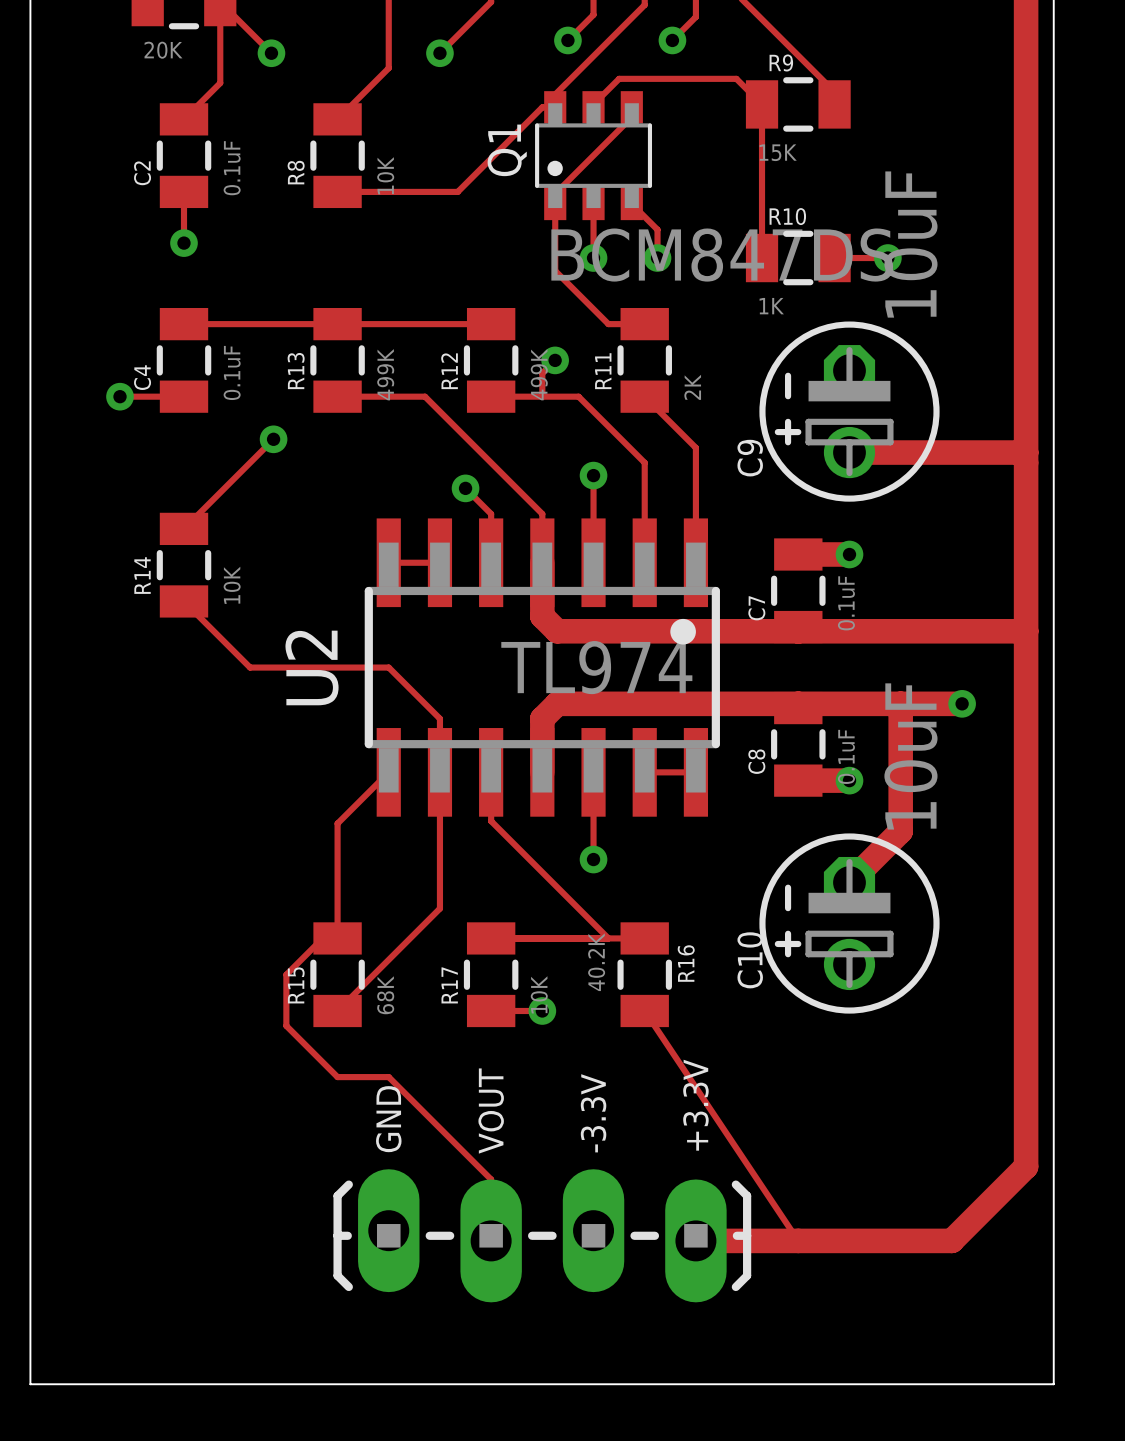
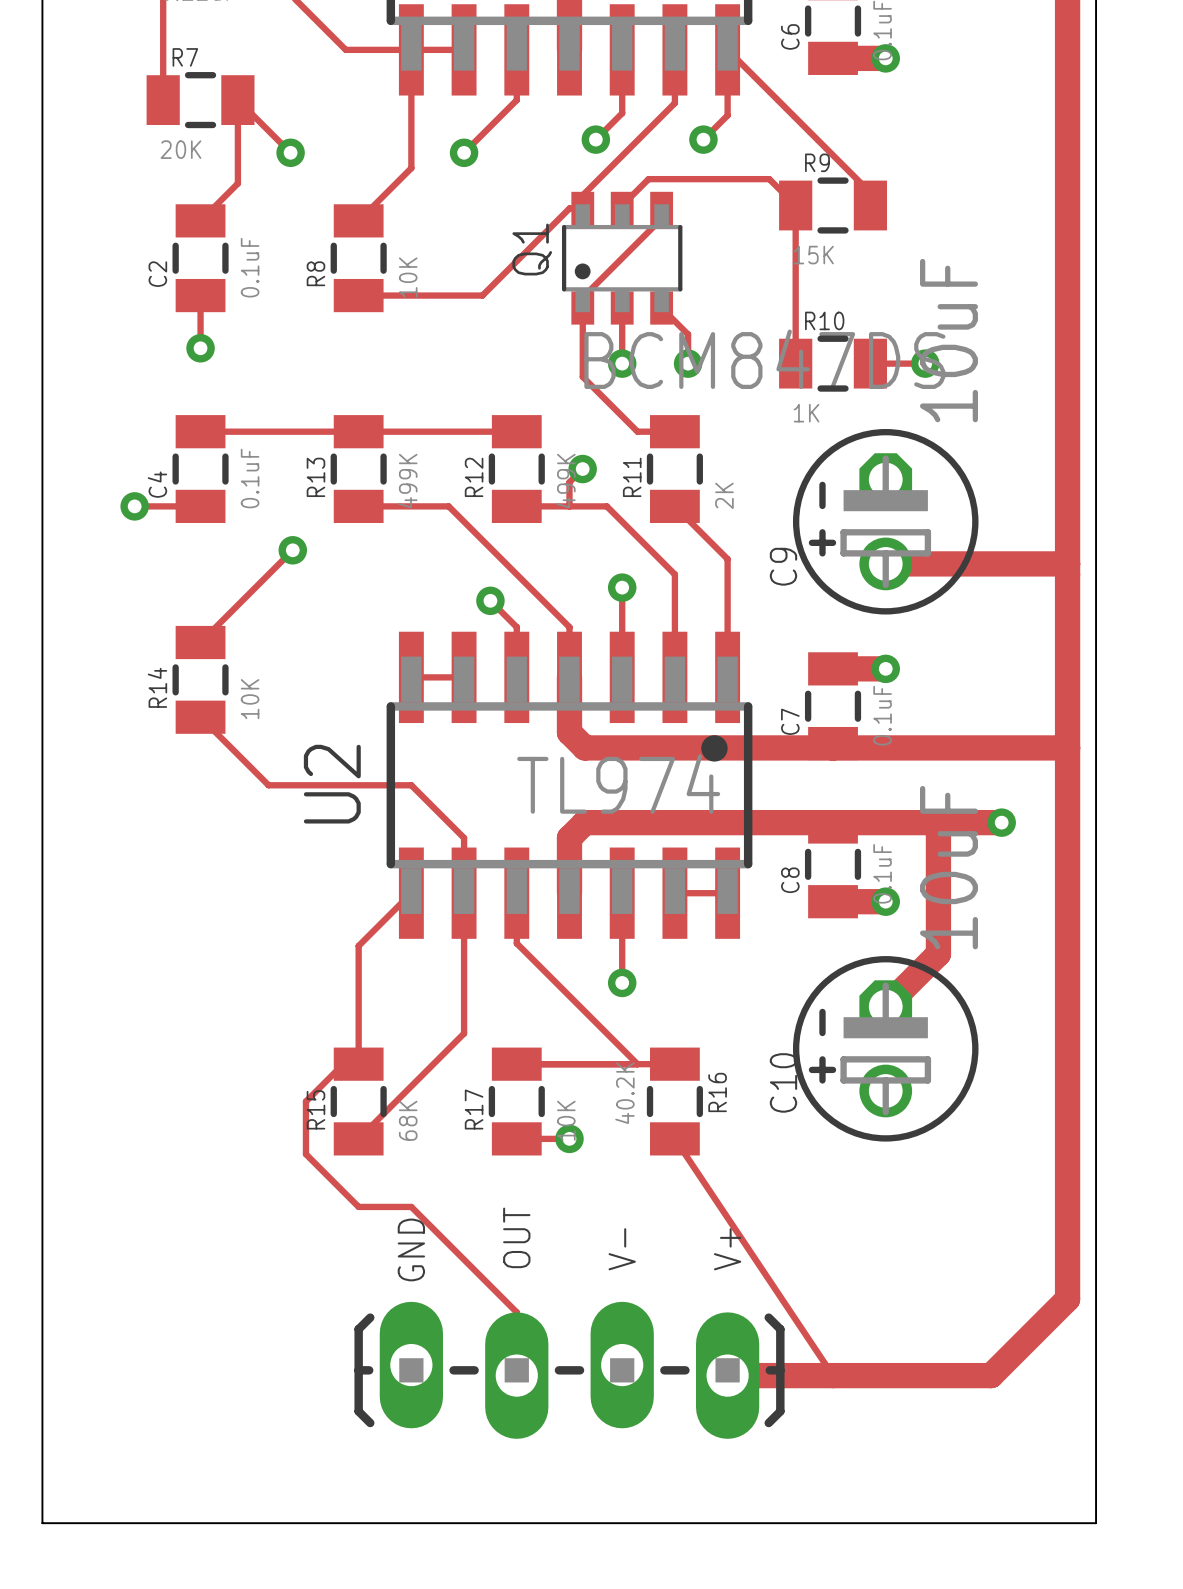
text: +3.3V (695, 1105) -> V+ (727, 1249)
text: VOUT (491, 1111) -> OUT (516, 1237)
text: -3.3V (593, 1113) -> V- (622, 1249)

